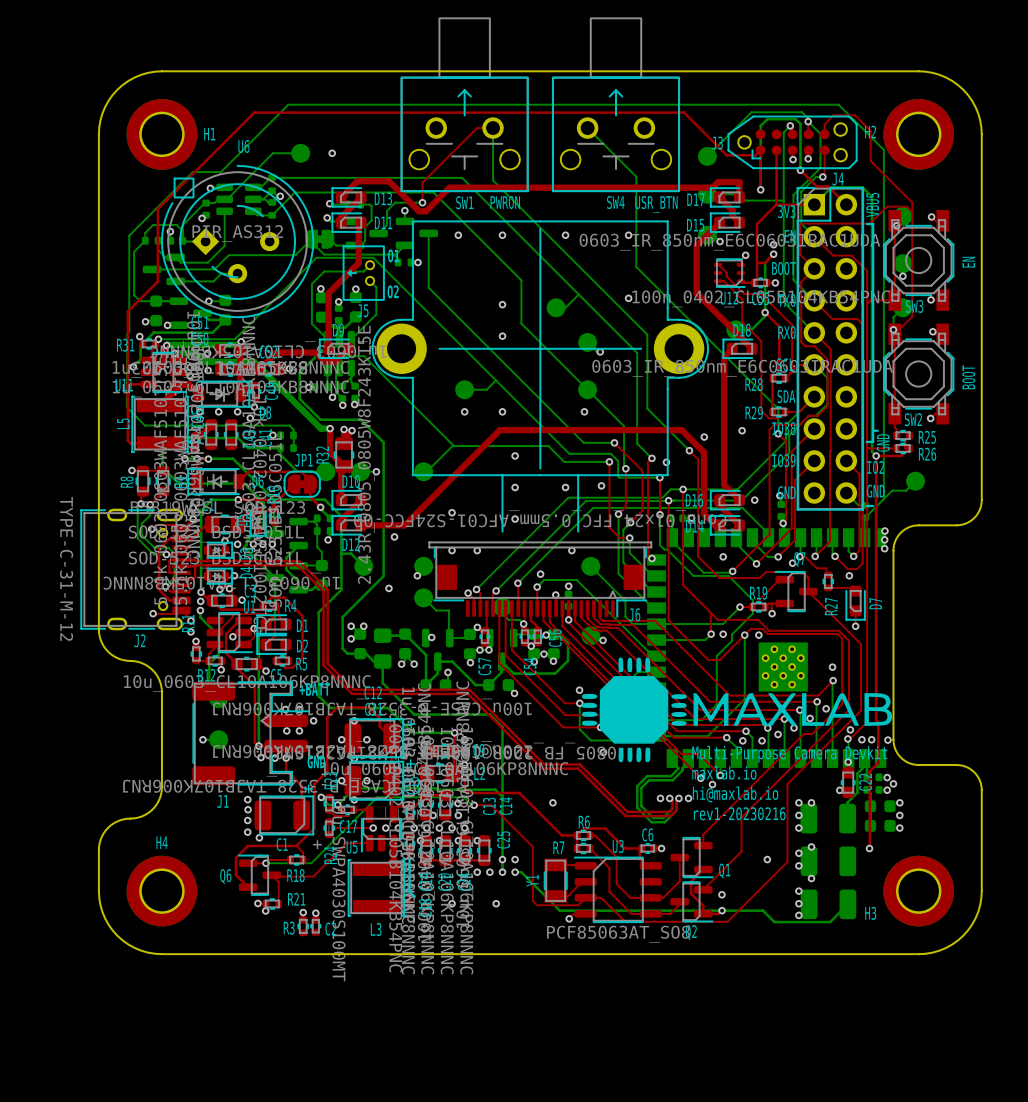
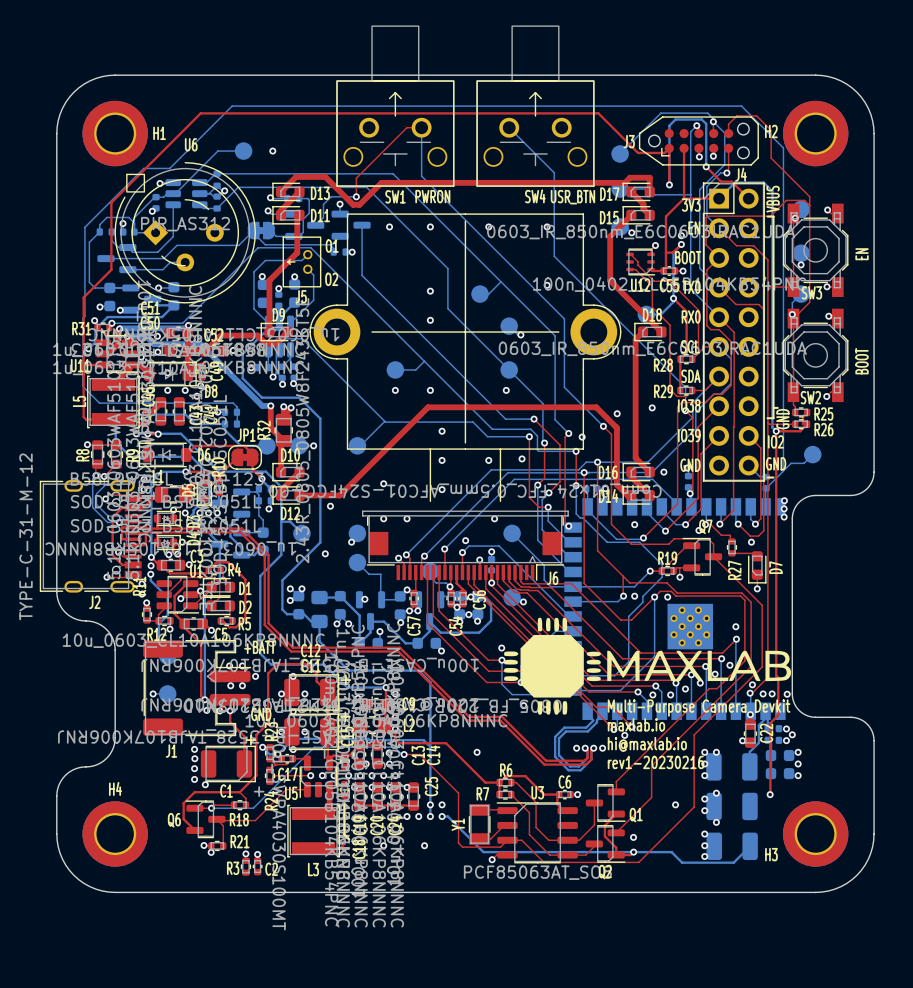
J2 value rotation: 0° (66, 568) -> 180° (26, 536)

